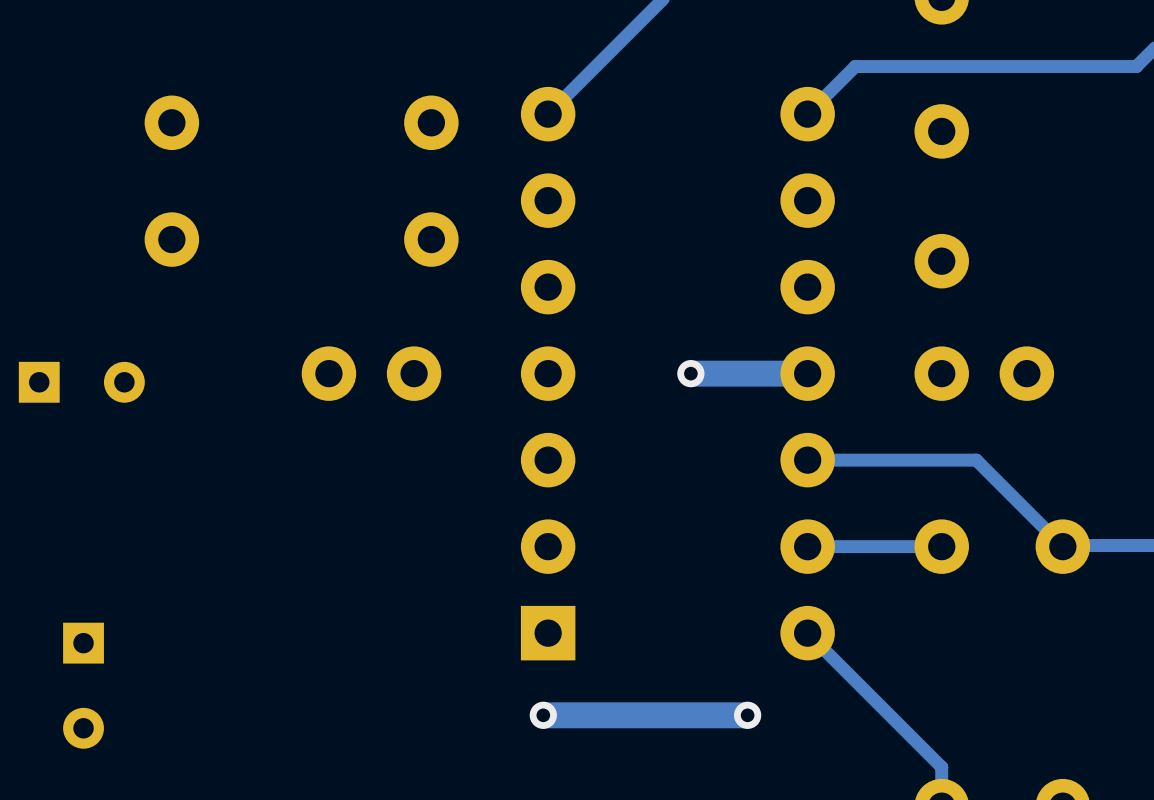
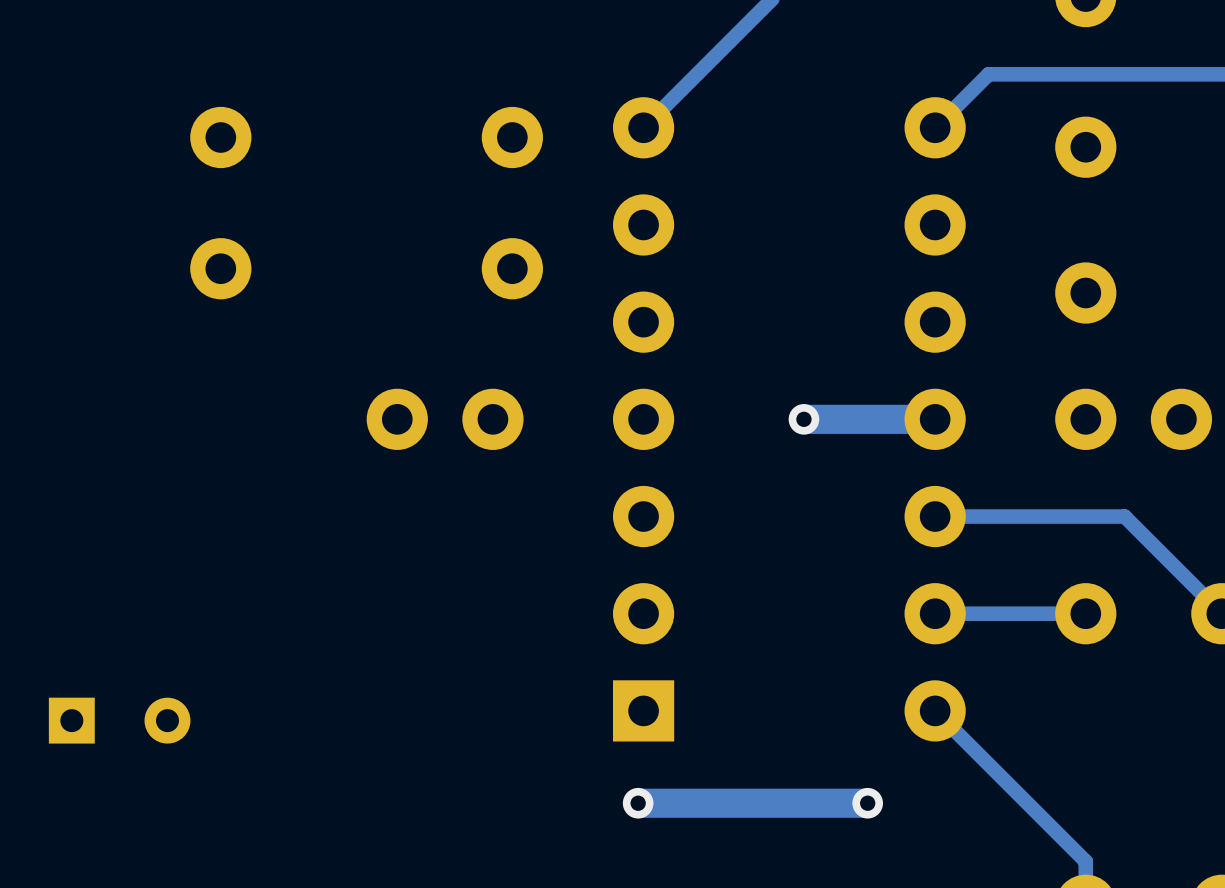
part: (81, 382) -> none
part rotation: 0° (83, 685) -> 90° counterclockwise (119, 720)

